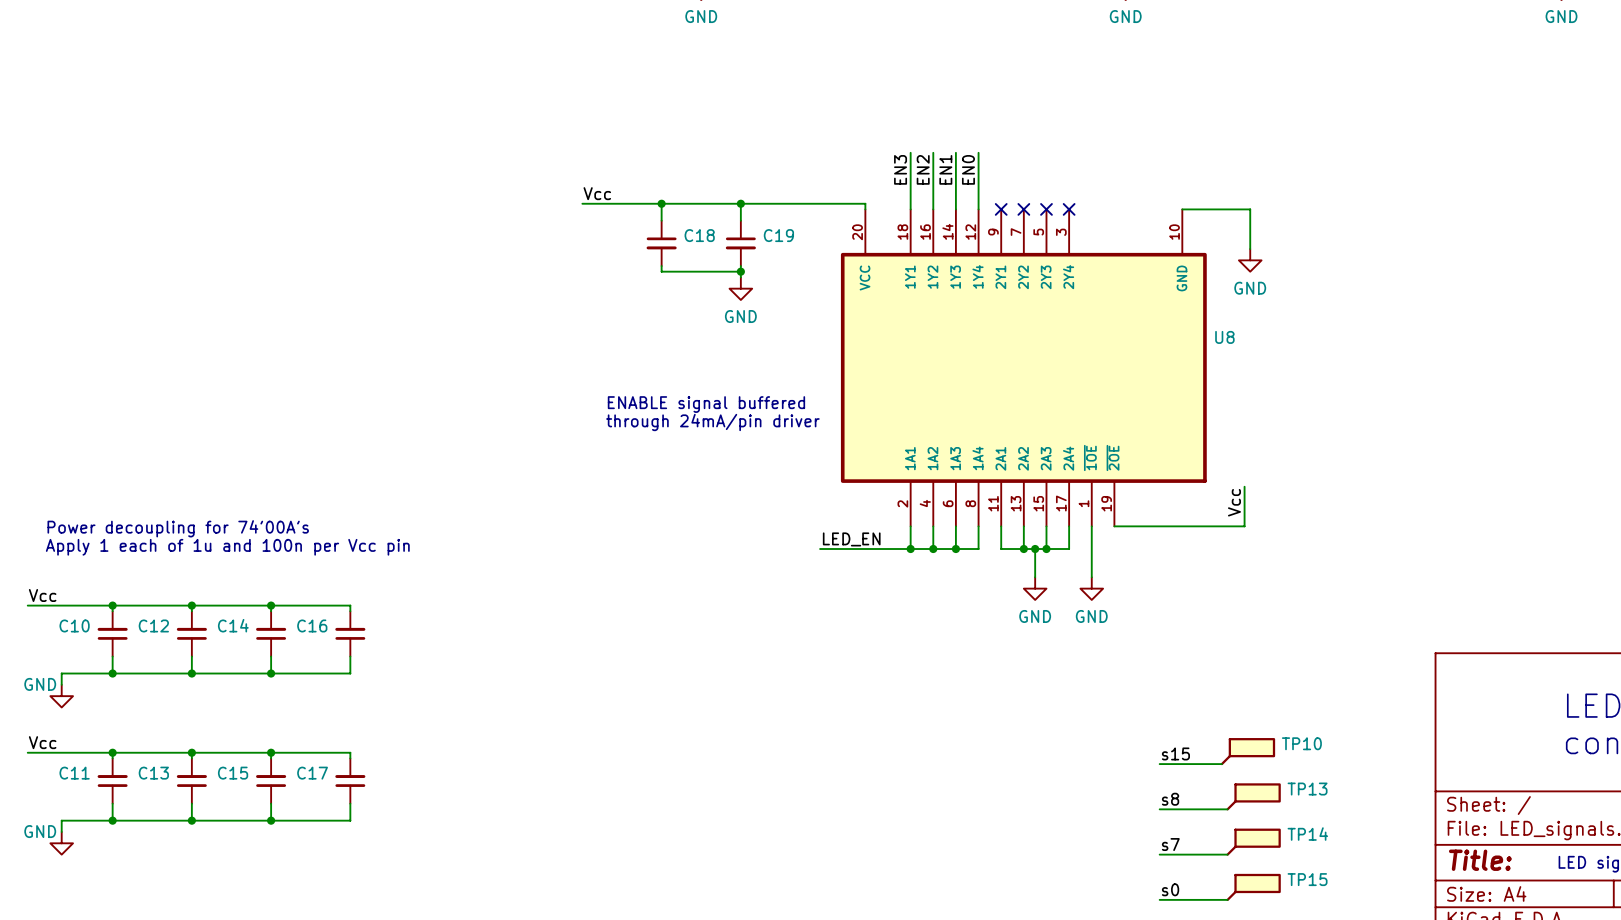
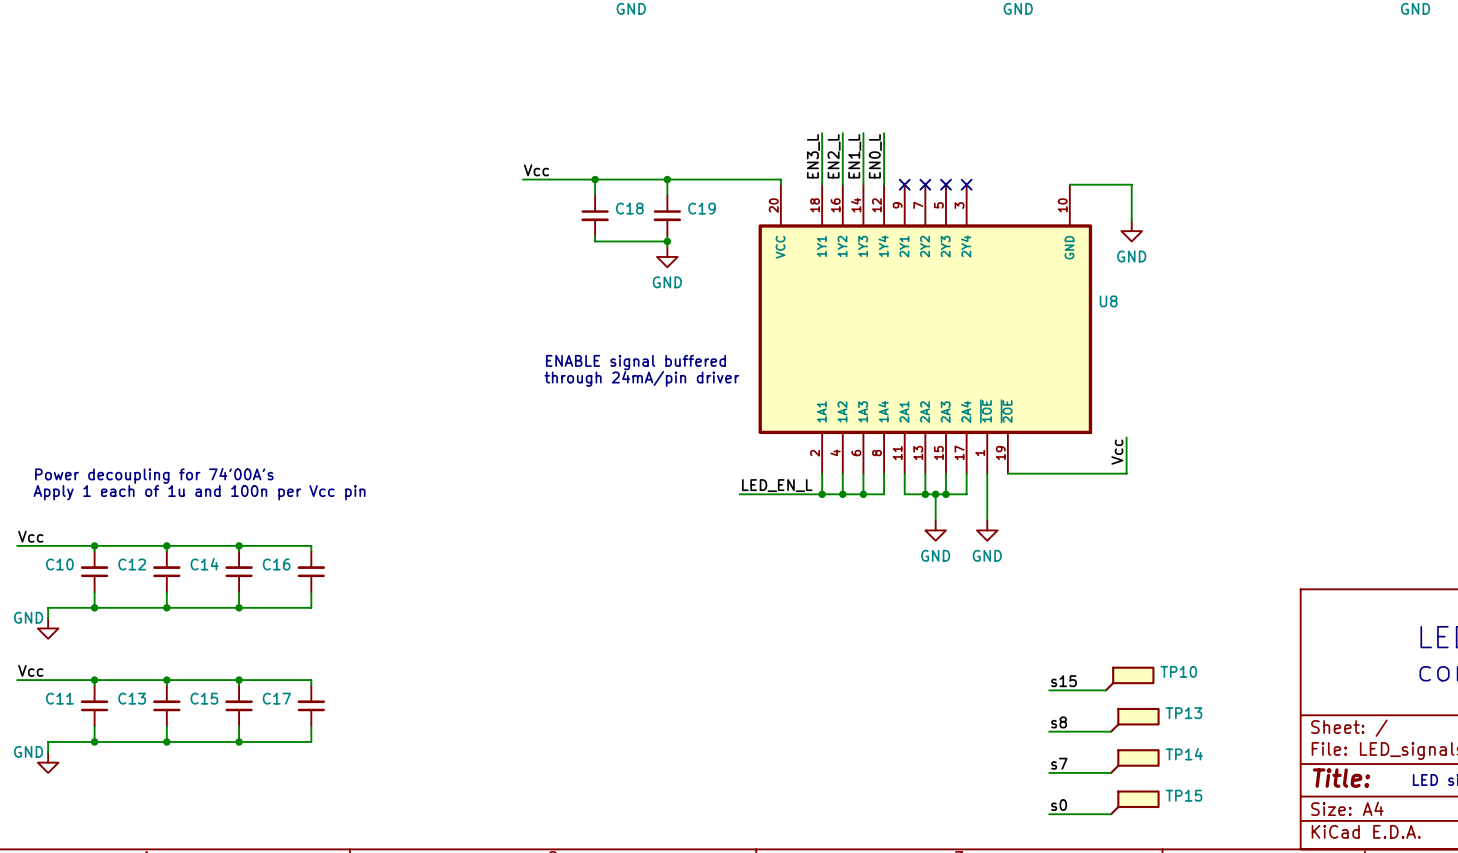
label: EN3 (900, 169) -> EN3_L (813, 156)
label: EN2 (923, 169) -> EN2_L (834, 156)
label: EN1 (945, 169) -> EN1_L (854, 156)
label: EN0 (968, 169) -> EN0_L (875, 156)
label: LED_EN (851, 539) -> LED_EN_L (777, 485)

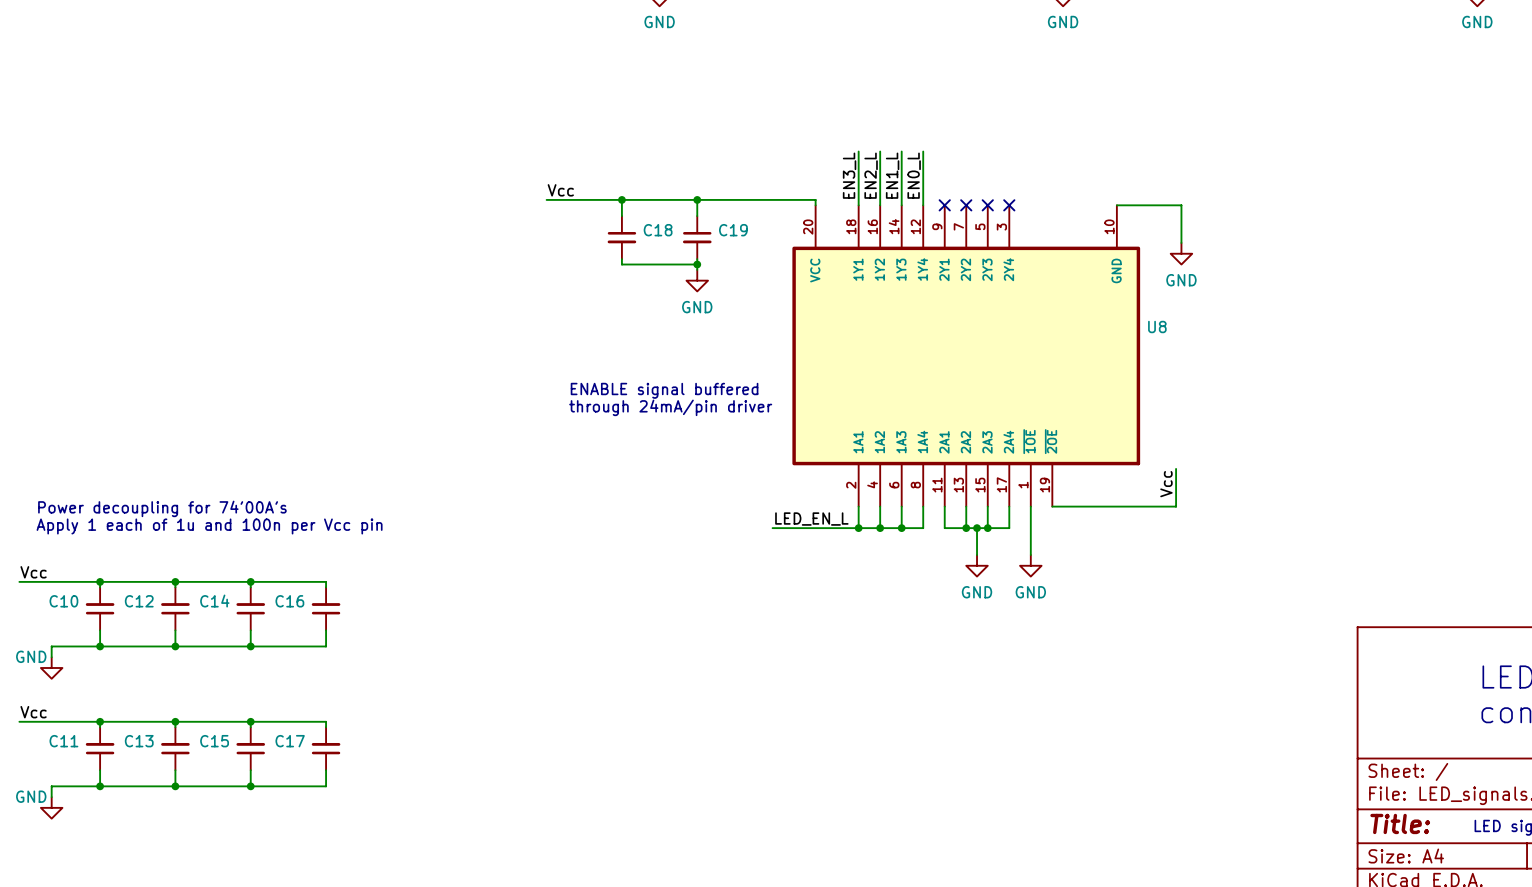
TP10: (1129, 679) -> none
label: s15 (1064, 681) -> none
wire: (1049, 690) (1105, 690) -> none
TP13: (1134, 720) -> none
label: s8 (1059, 722) -> none
wire: (1049, 731) (1111, 731) -> none
TP14: (1134, 761) -> none
label: s7 (1059, 763) -> none
wire: (1049, 772) (1111, 772) -> none
TP15: (1134, 802) -> none
label: s0 (1059, 805) -> none
wire: (1049, 814) (1111, 814) -> none

